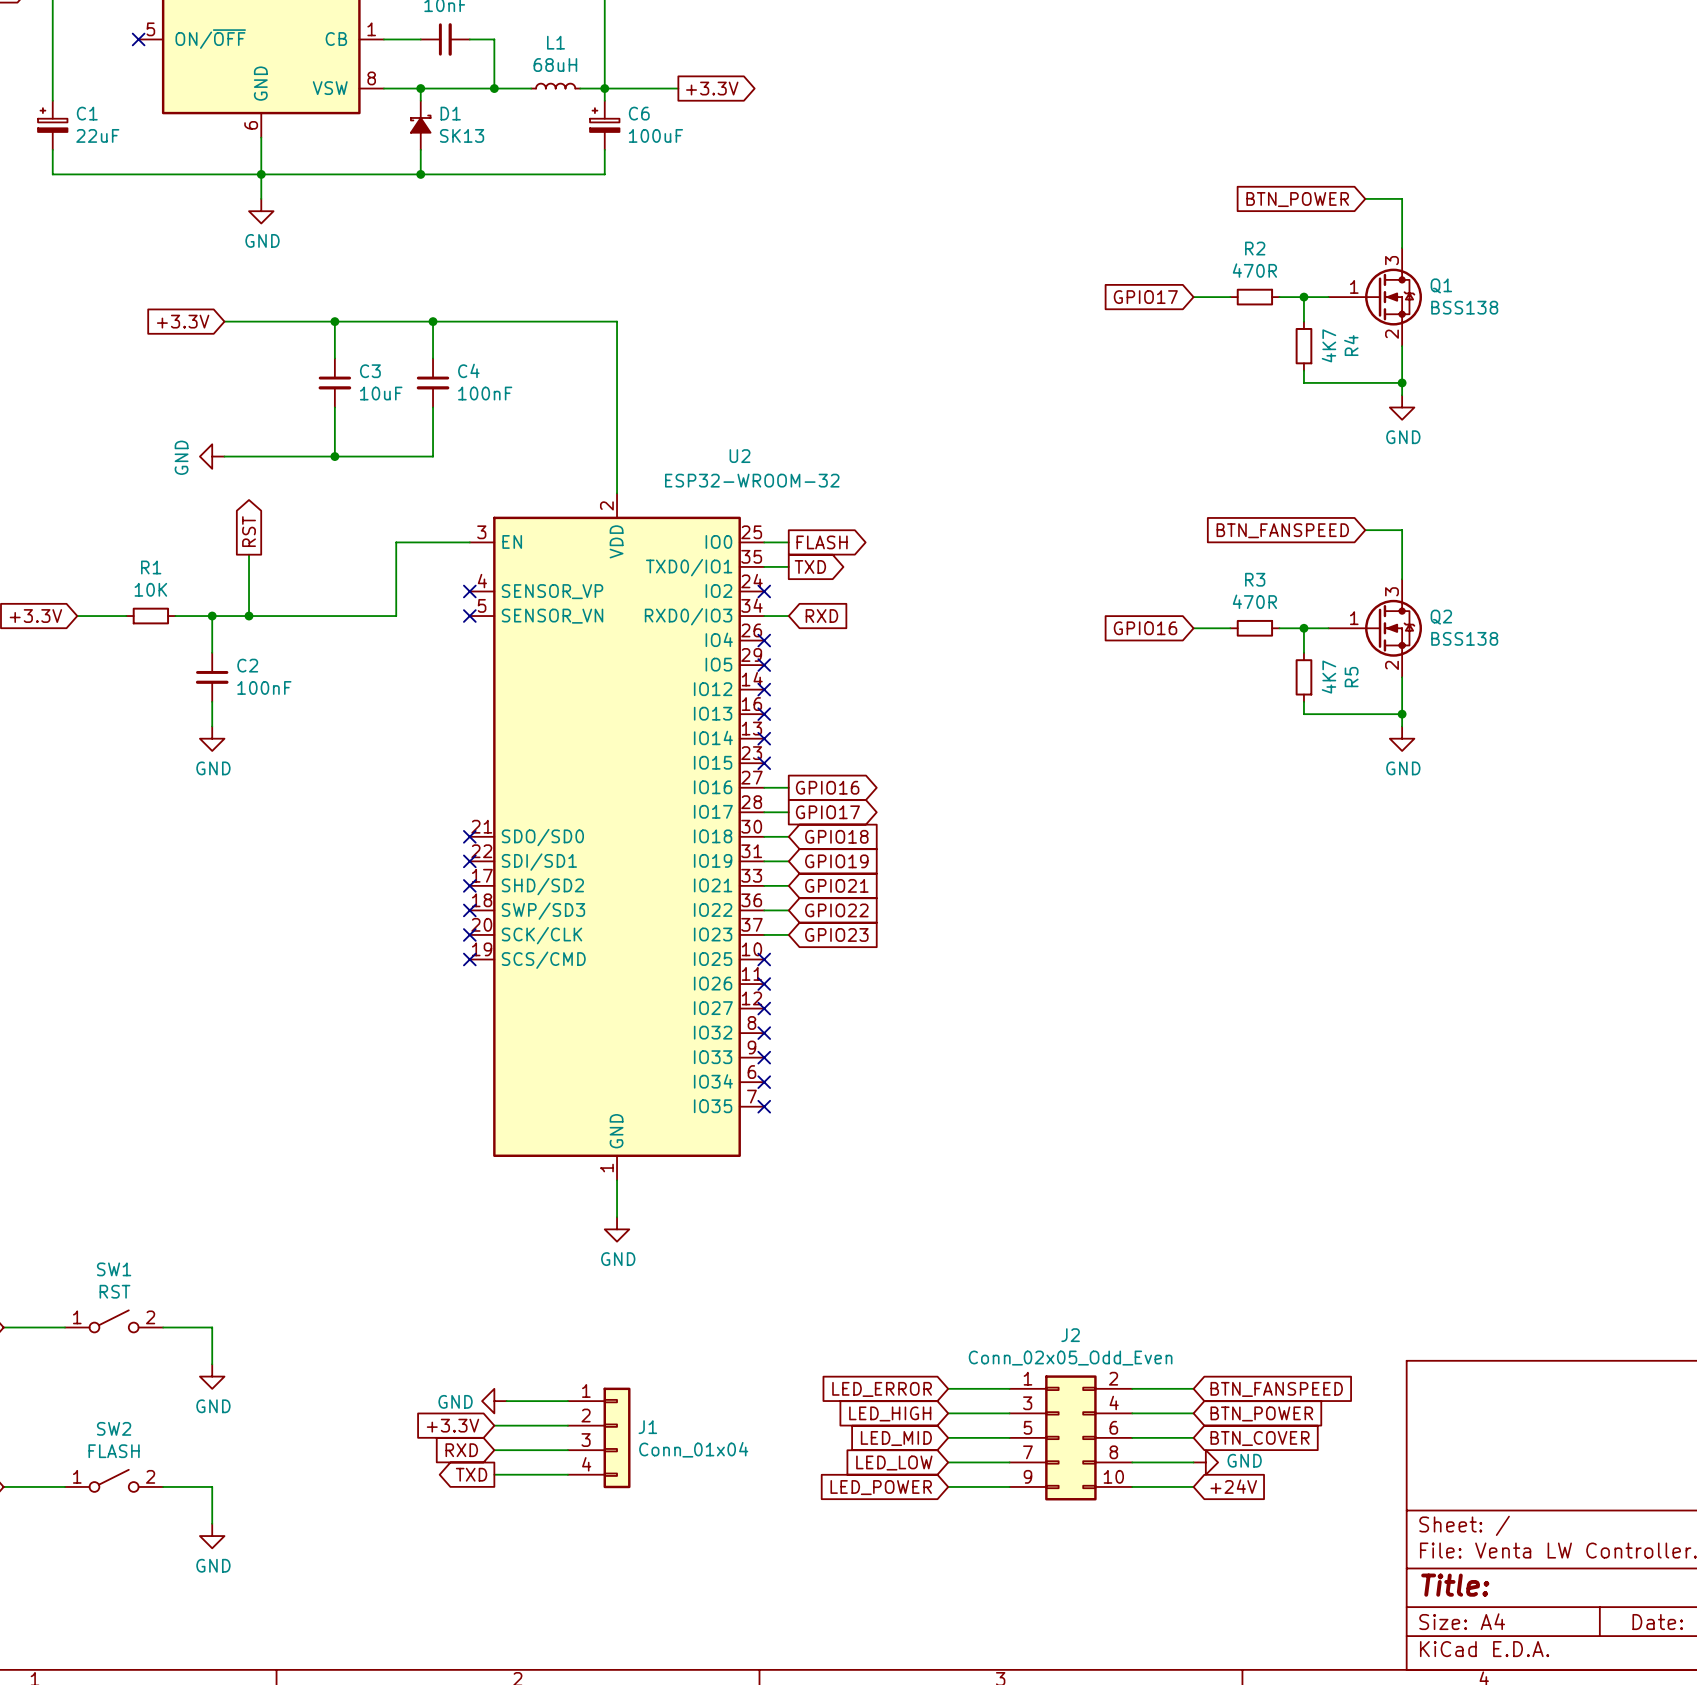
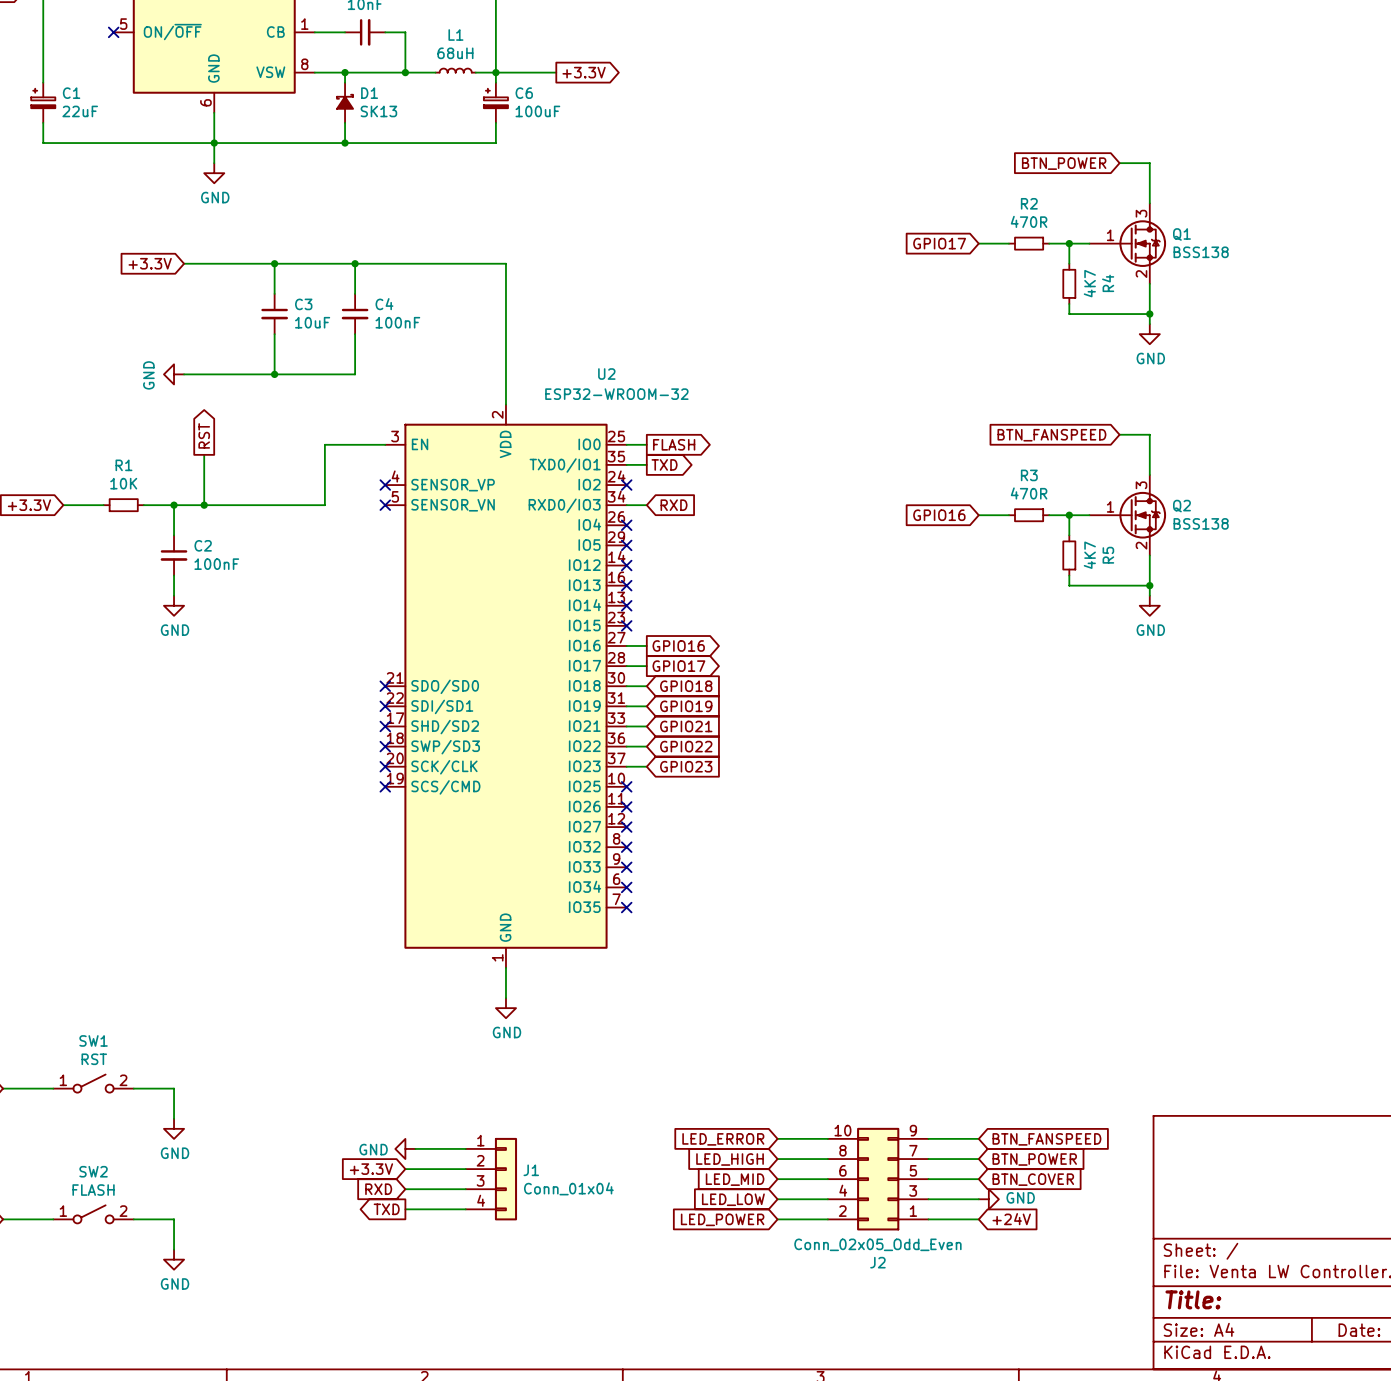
J2 rotation: 0° (1070, 1437) -> 180° (878, 1179)

